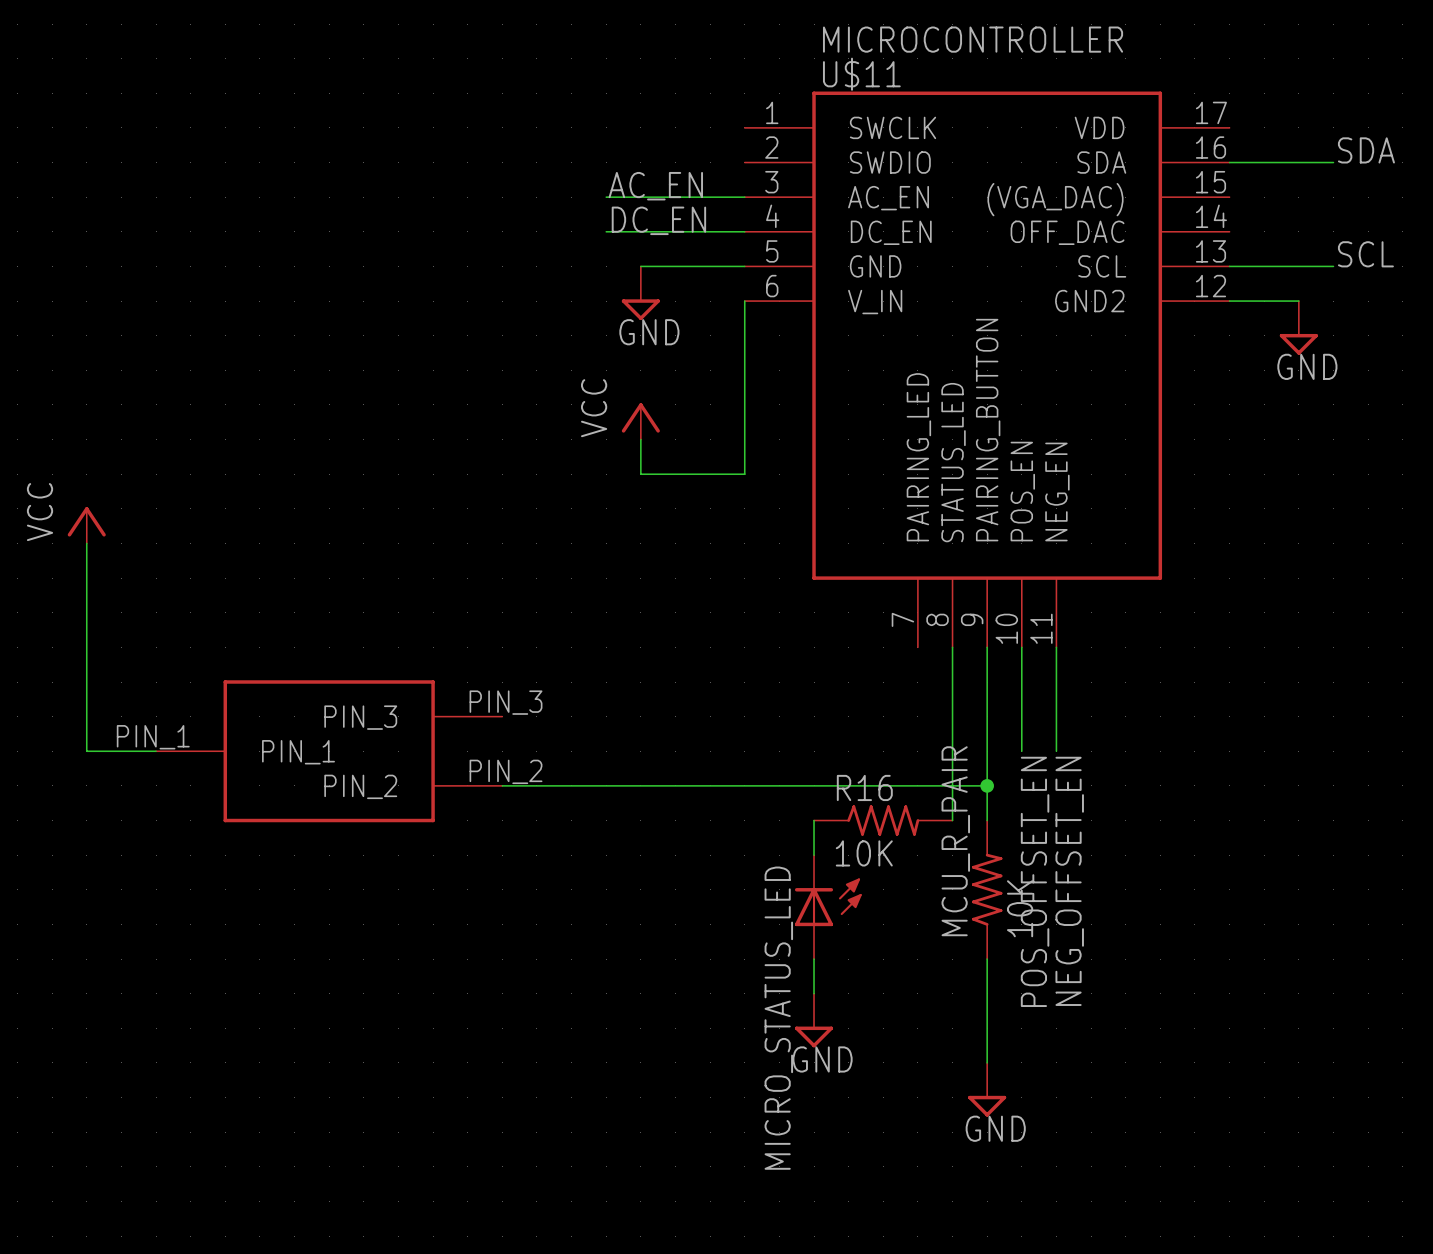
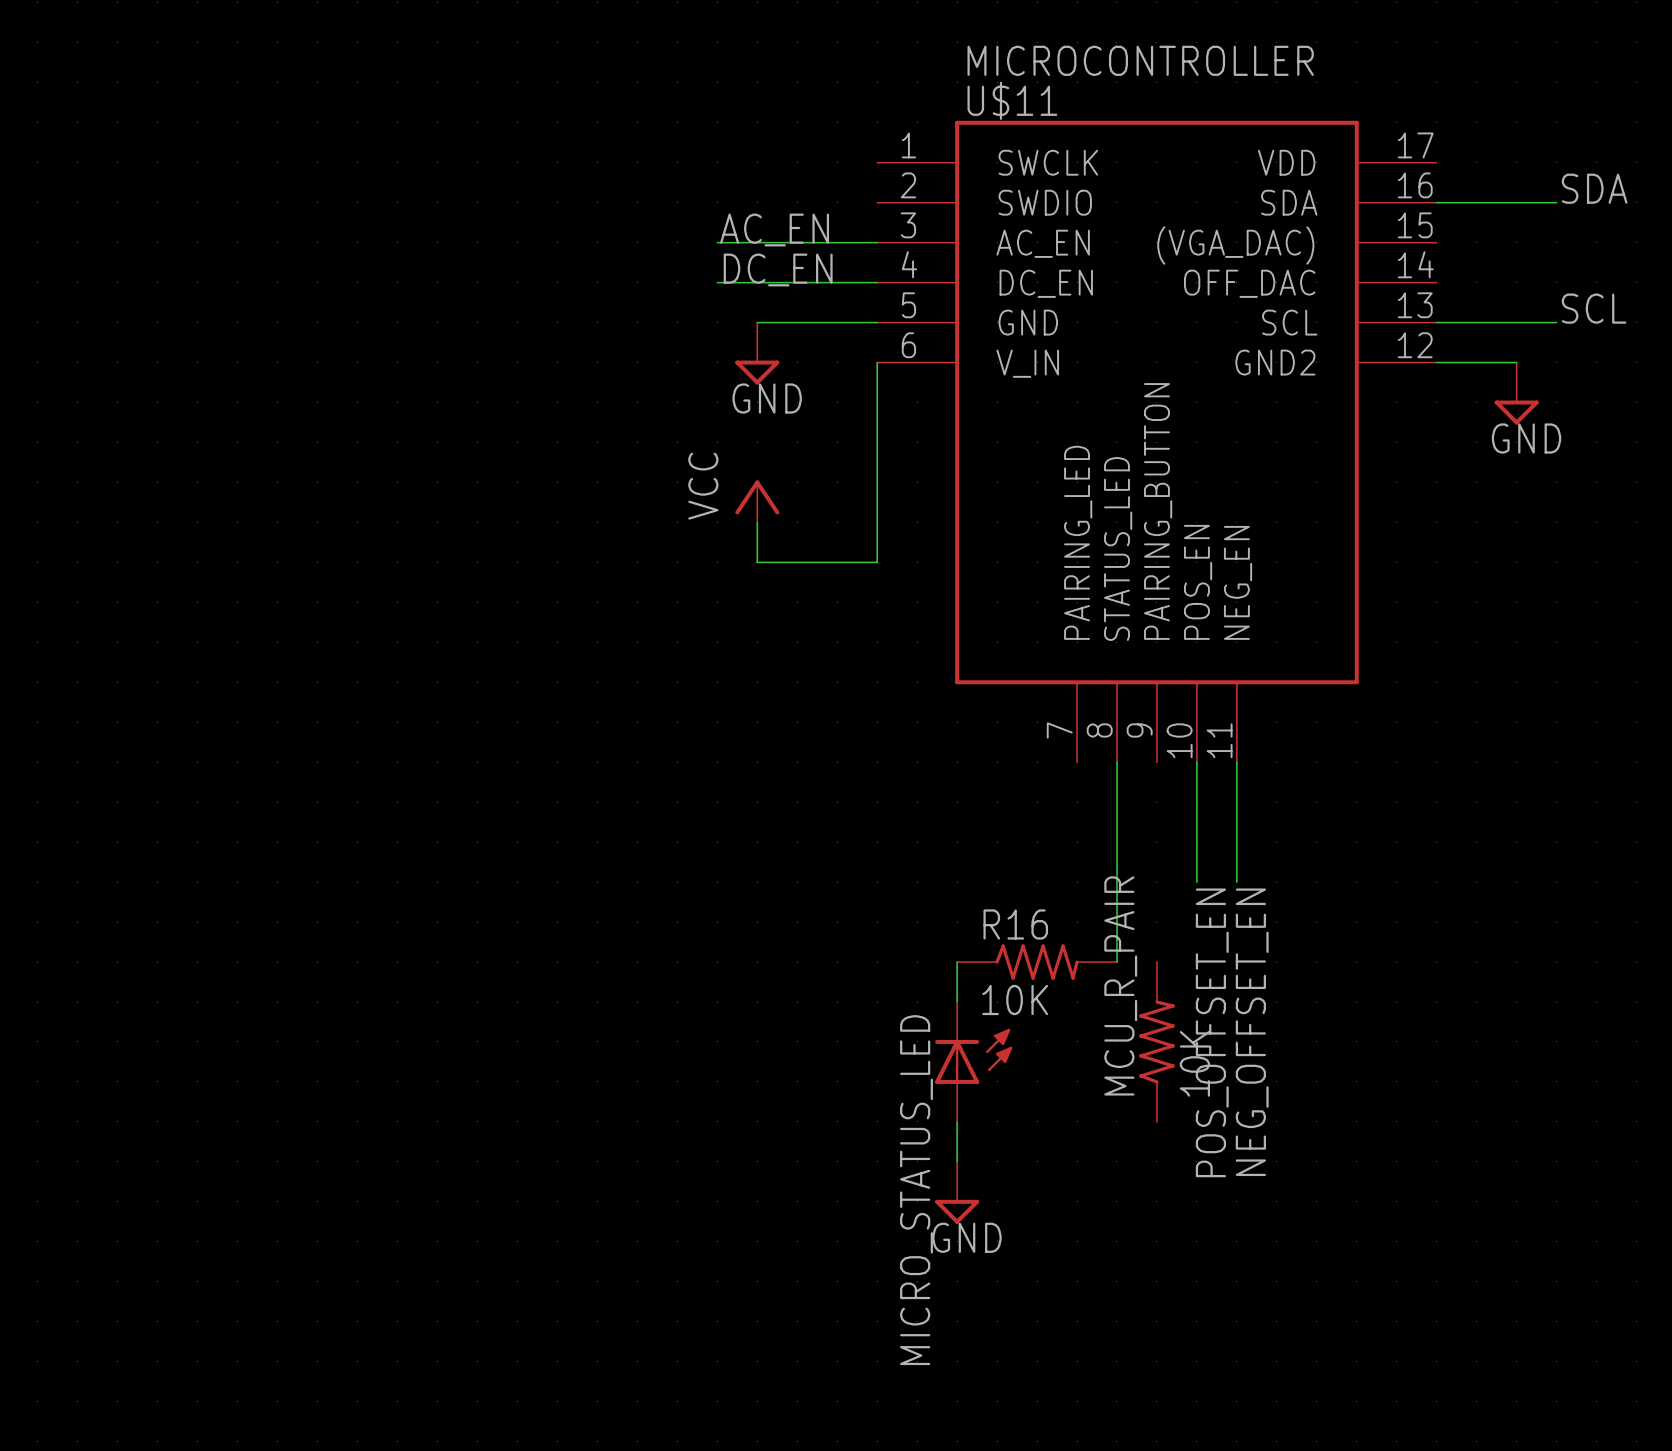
power symbol: VCC (86, 525) -> none
wire: (86, 543) (86, 751) (156, 751) -> none
wire: (987, 647) (987, 820) -> none
part: (329, 751) -> none
wire: (502, 785) (987, 785) -> none
junction: (987, 785) -> none
wire: (987, 959) (987, 1062) -> none
power symbol: GND (987, 1089) -> none

